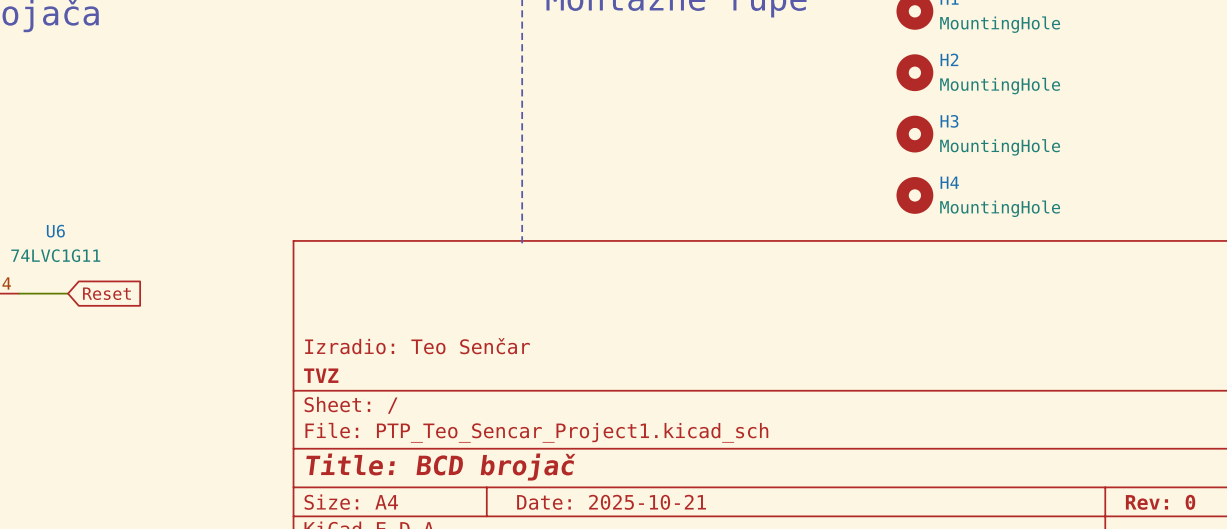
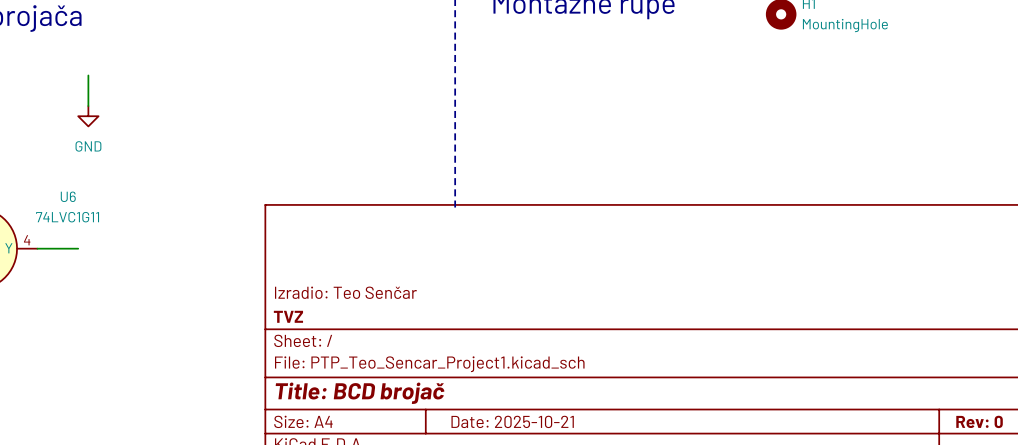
H2: MountingHole (914, 72) -> none
wire: none -> (88, 75) (88, 106)
power symbol: none -> GND (88, 116)
H3: MountingHole (914, 134) -> none
H4: MountingHole (914, 195) -> none
global label: Reset (106, 293) -> none

